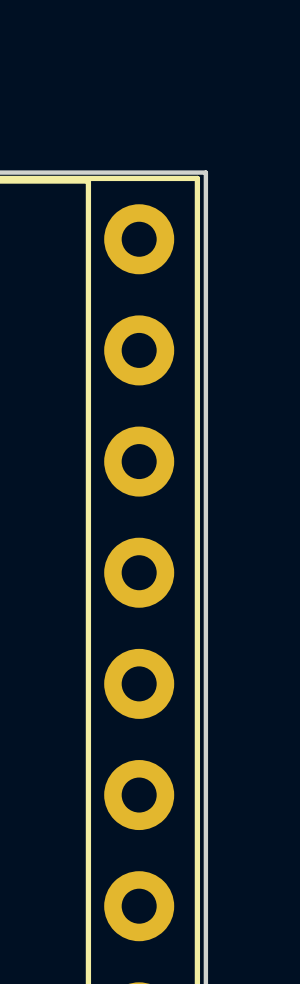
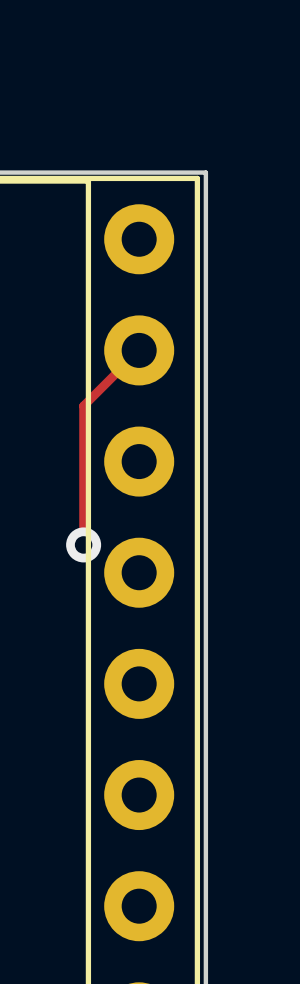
track: none -> (139, 350) (83, 405) (83, 544)
via: none -> (83, 544)

